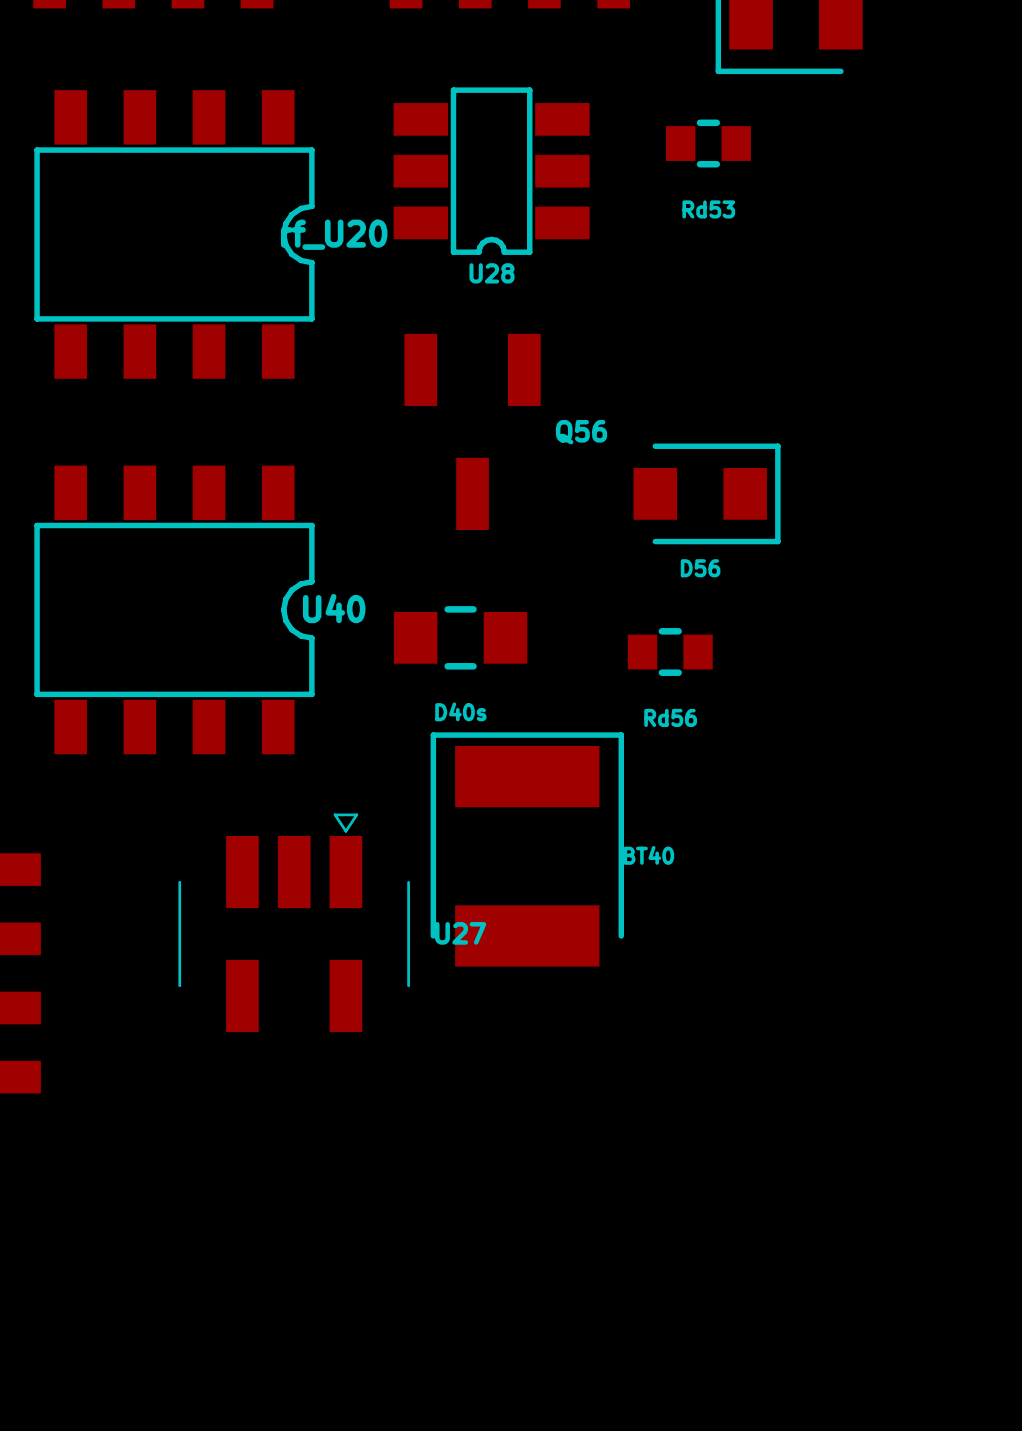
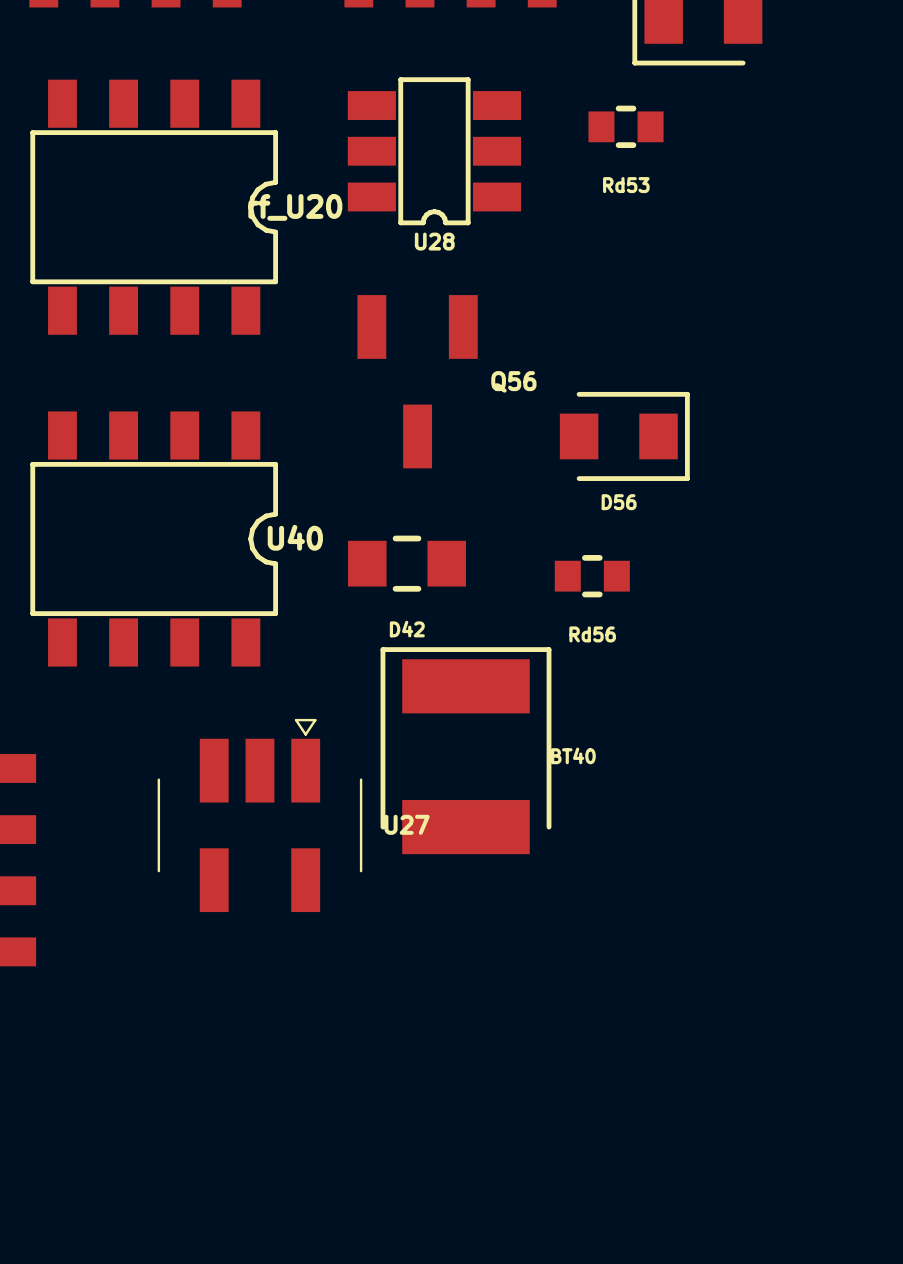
D40s name: D40s (460, 711) -> D42 (407, 629)

